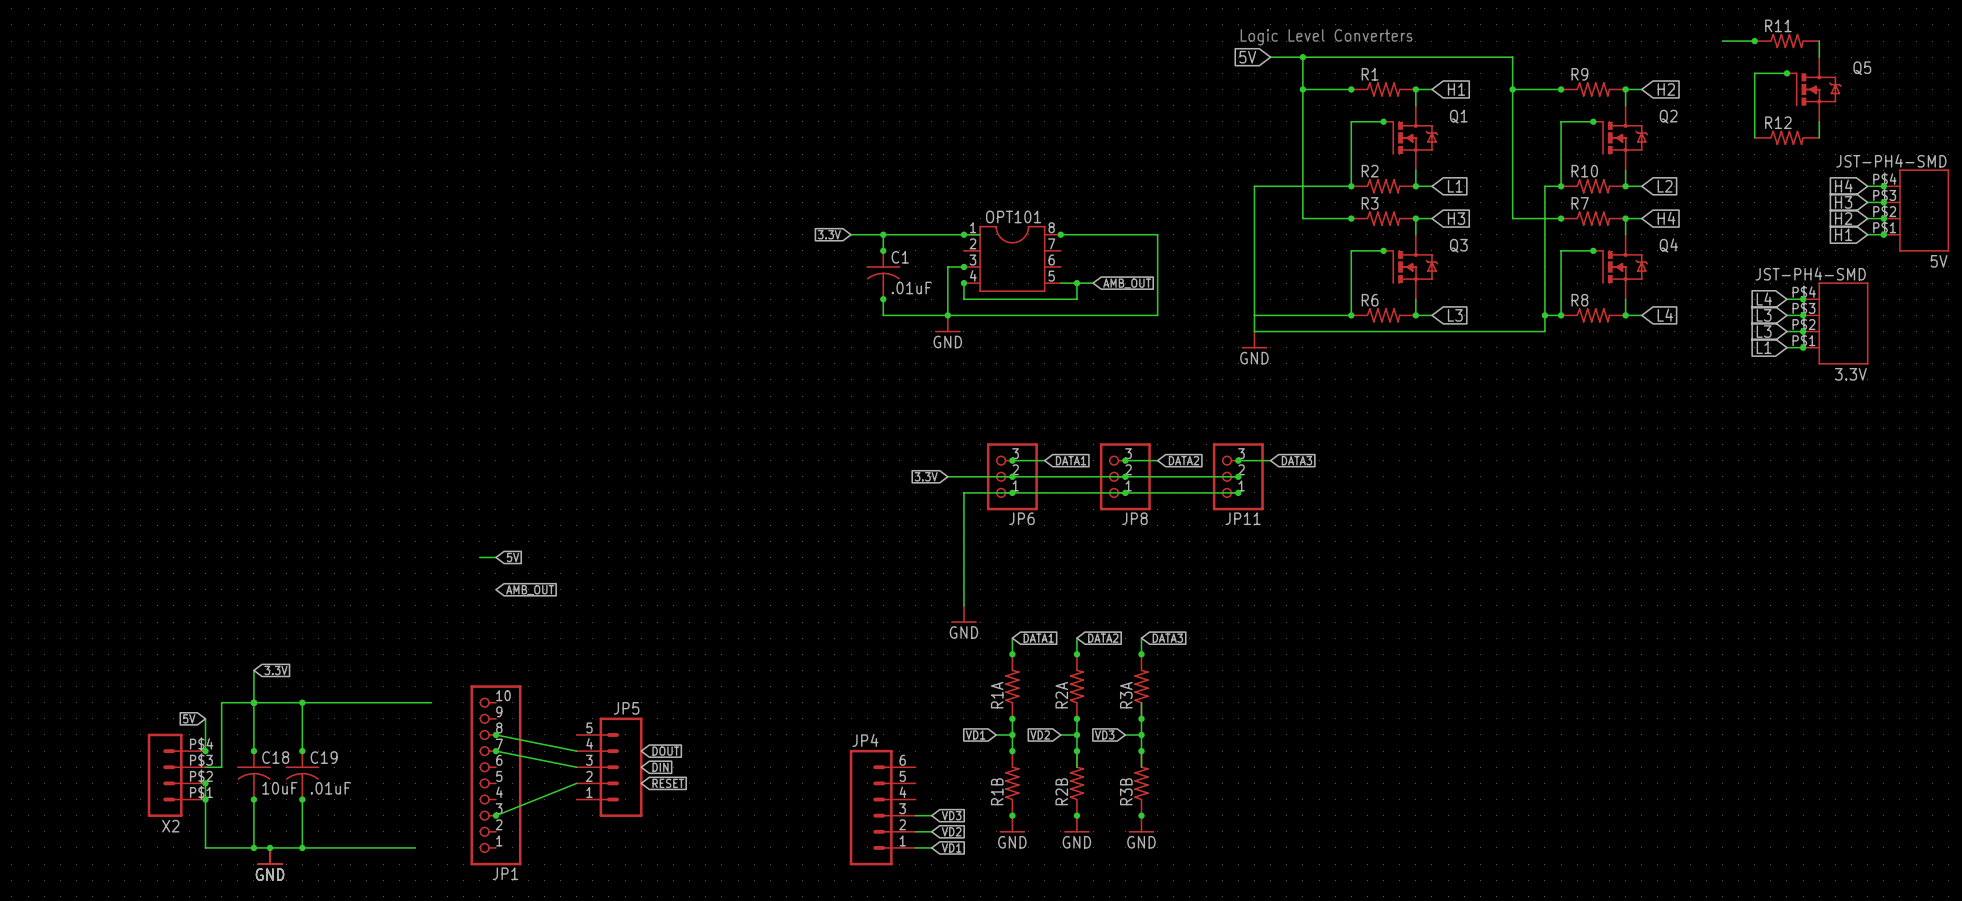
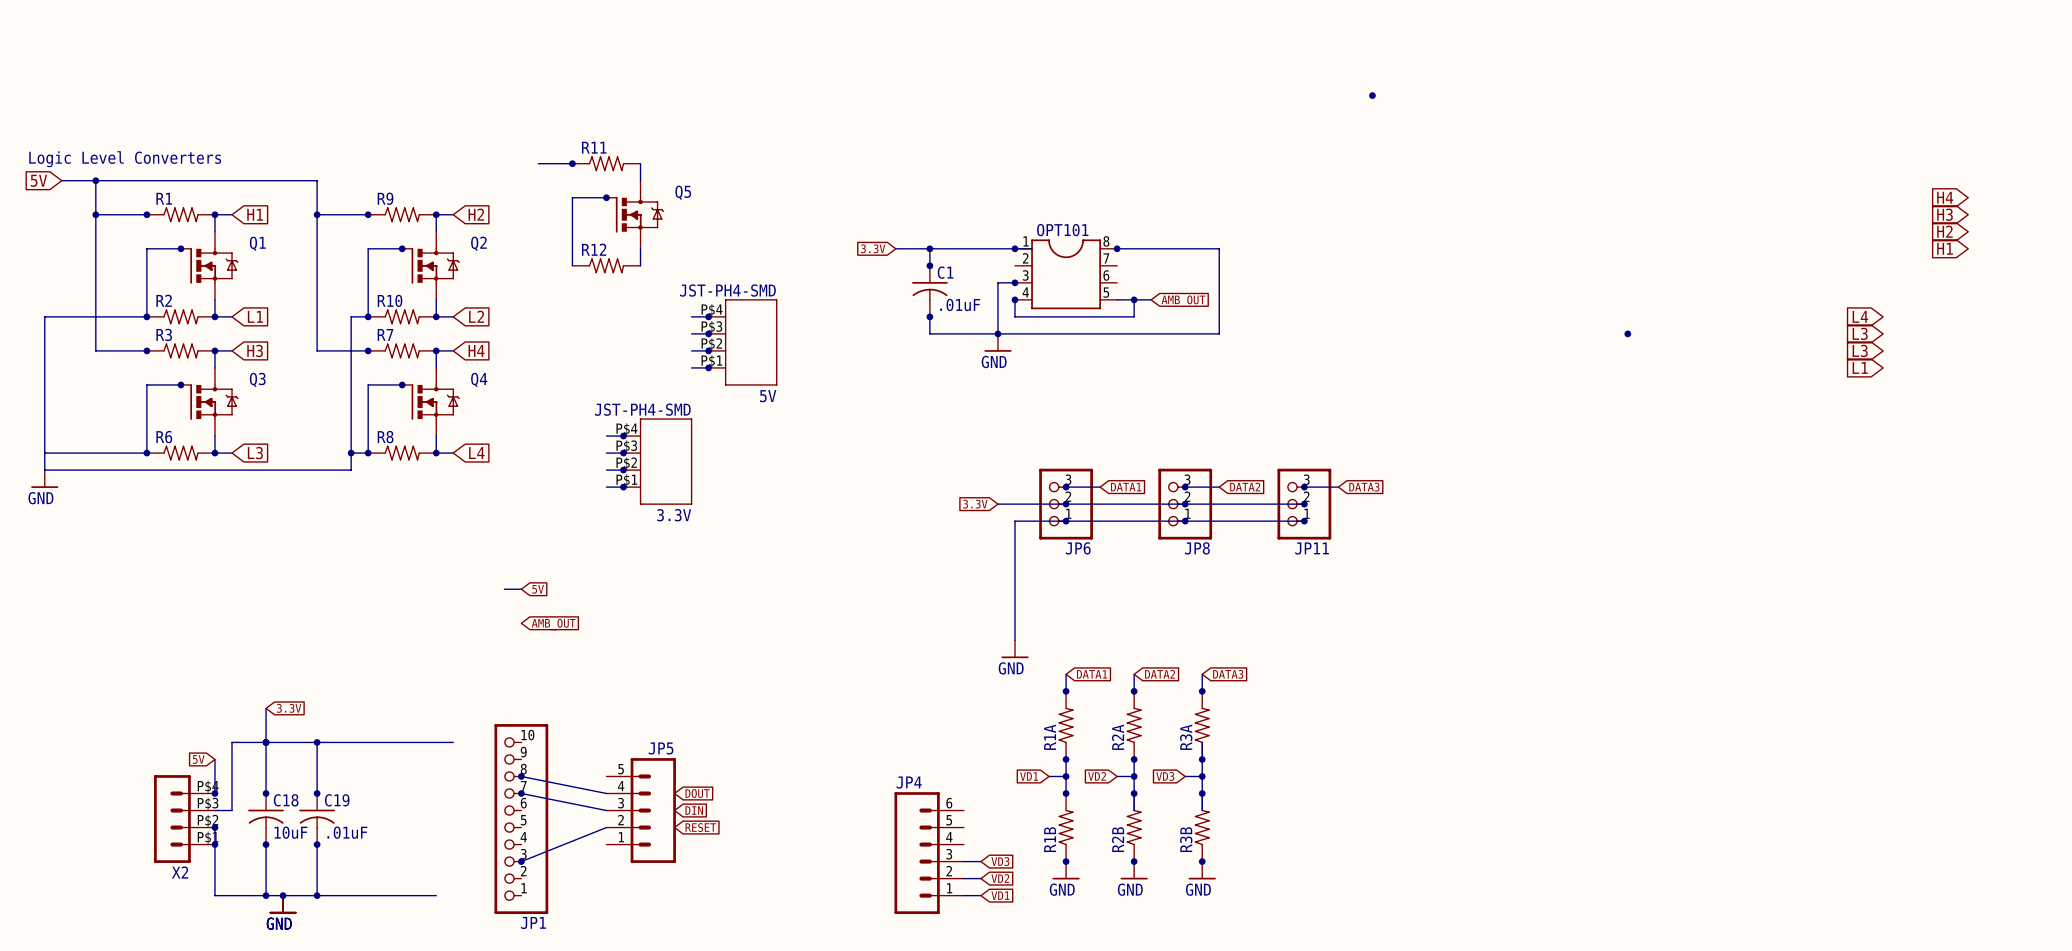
text: Logic Level Converters (1326, 37) -> none
wire: (1722, 41) (1754, 41) -> none
junction: (1754, 41) -> none
R11 position: (1786, 41) -> (606, 163)
wire: (1819, 41) (1819, 57) -> none
global label: 5V (1247, 57) -> none
wire: (1270, 57) (1512, 57) (1512, 218) (1561, 218) -> none
wire: (1302, 57) (1302, 218) (1351, 218) -> none
junction: (1302, 57) -> none
wire: (1786, 73) (1754, 73) (1754, 137) -> none
junction: (1786, 73) -> none
wire: (1302, 89) (1351, 89) -> none
junction: (1351, 89) -> none
R1 position: (1383, 89) -> (180, 214)
junction: (1415, 89) -> none
wire: (1431, 89) (1415, 89) (1415, 105) -> none
global label: H1 (1456, 89) -> none
wire: (1512, 89) (1561, 89) -> none
junction: (1512, 89) -> none
junction: (1561, 89) -> none
R9 position: (1593, 89) -> (402, 214)
junction: (1625, 89) -> none
wire: (1641, 89) (1625, 89) (1625, 105) -> none
global label: H2 (1666, 89) -> none
Q5 position: (1814, 89) -> (634, 214)
wire: (1383, 121) (1351, 121) (1351, 186) (1254, 186) (1254, 331) (1544, 331) (1544, 186) (1561, 186) (1561, 121) (1593, 121) -> none
junction: (1383, 121) -> none
junction: (1593, 121) -> none
wire: (1819, 121) (1819, 137) -> none
Q1 position: (1410, 137) -> (209, 265)
Q2 position: (1620, 137) -> (430, 265)
R12 position: (1786, 137) -> (606, 265)
text: none -> Logic Level Converters (125, 159)
wire: none -> (538, 163) (572, 163)
junction: none -> (572, 163)
wire: none -> (640, 163) (640, 180)
global label: none -> 5V (38, 180)
wire: none -> (61, 180) (317, 180) (317, 350) (368, 350)
wire: none -> (95, 180) (95, 350) (146, 350)
junction: none -> (95, 180)
wire: (1415, 170) (1415, 186) (1431, 186) -> none
wire: (1625, 170) (1625, 186) (1641, 186) -> none
wire: none -> (606, 197) (572, 197) (572, 265)
junction: none -> (606, 197)
junction: (1351, 186) -> none
R2 position: (1383, 186) -> (180, 316)
junction: (1415, 186) -> none
global label: L1 (1455, 186) -> none
junction: (1561, 186) -> none
R10 position: (1593, 186) -> (402, 316)
junction: (1625, 186) -> none
global label: L2 (1665, 186) -> none
wire: (1867, 186) (1883, 186) -> none
junction: (1883, 186) -> none
wire: none -> (95, 214) (146, 214)
junction: none -> (95, 214)
junction: none -> (146, 214)
junction: none -> (214, 214)
wire: none -> (232, 214) (214, 214) (214, 231)
global label: none -> H1 (255, 214)
wire: none -> (317, 214) (368, 214)
junction: none -> (317, 214)
junction: none -> (368, 214)
junction: none -> (436, 214)
wire: none -> (453, 214) (436, 214) (436, 231)
global label: none -> H2 (476, 214)
wire: (1867, 202) (1883, 202) -> none
junction: (1883, 202) -> none
5V position: (1916, 210) -> (742, 342)
junction: (1351, 218) -> none
R3 position: (1383, 218) -> (180, 350)
junction: (1415, 218) -> none
wire: (1431, 218) (1415, 218) (1415, 234) -> none
global label: H3 (1456, 218) -> none
junction: (1561, 218) -> none
R7 position: (1593, 218) -> (402, 350)
junction: (1625, 218) -> none
wire: (1641, 218) (1625, 218) (1625, 234) -> none
global label: H4 (1666, 218) -> none
wire: (1867, 218) (1883, 218) -> none
junction: (1883, 218) -> none
wire: none -> (180, 248) (146, 248) (146, 316) (44, 316) (44, 470) (351, 470) (351, 316) (368, 316) (368, 248) (402, 248)
junction: none -> (180, 248)
junction: none -> (402, 248)
wire: none -> (640, 248) (640, 265)
wire: (1867, 234) (1883, 234) -> none
junction: (1883, 234) -> none
wire: (1383, 250) (1351, 250) (1351, 315) (1254, 315) -> none
junction: (1383, 250) -> none
wire: (1593, 250) (1561, 250) (1561, 315) (1544, 315) -> none
junction: (1593, 250) -> none
Q3 position: (1410, 266) -> (209, 402)
Q4 position: (1620, 266) -> (430, 402)
wire: none -> (214, 299) (214, 316) (232, 316)
wire: none -> (436, 299) (436, 316) (453, 316)
junction: none -> (146, 316)
junction: none -> (214, 316)
global label: none -> L1 (255, 316)
junction: none -> (368, 316)
junction: none -> (436, 316)
global label: none -> L2 (476, 316)
wire: none -> (691, 316) (708, 316)
junction: none -> (708, 316)
wire: (1415, 299) (1415, 315) (1431, 315) -> none
wire: (1625, 299) (1625, 315) (1641, 315) -> none
wire: (1786, 299) (1803, 299) -> none
junction: (1803, 299) -> none
wire: none -> (691, 333) (708, 333)
junction: none -> (708, 333)
junction: (1351, 315) -> none
R6 position: (1383, 315) -> (180, 453)
junction: (1415, 315) -> none
global label: L3 (1455, 315) -> none
junction: (1561, 315) -> none
R8 position: (1593, 315) -> (402, 453)
junction: (1625, 315) -> none
global label: L4 (1665, 315) -> none
wire: (1786, 315) (1803, 315) -> none
junction: (1803, 315) -> none
3.3V position: (1835, 323) -> (657, 461)
junction: none -> (146, 350)
junction: none -> (214, 350)
wire: none -> (232, 350) (214, 350) (214, 367)
global label: none -> H3 (255, 350)
junction: none -> (368, 350)
junction: none -> (436, 350)
wire: none -> (453, 350) (436, 350) (436, 367)
global label: none -> H4 (476, 350)
wire: none -> (691, 350) (708, 350)
junction: none -> (708, 350)
wire: (1786, 331) (1803, 331) -> none
junction: (1803, 331) -> none
power symbol: GND (1254, 340) -> none
wire: none -> (691, 367) (708, 367)
junction: none -> (708, 367)
wire: (1786, 347) (1803, 347) -> none
junction: (1803, 347) -> none
wire: none -> (180, 384) (146, 384) (146, 453) (44, 453)
junction: none -> (180, 384)
wire: none -> (402, 384) (368, 384) (368, 453) (351, 453)
junction: none -> (402, 384)
wire: none -> (214, 436) (214, 453) (232, 453)
wire: none -> (436, 436) (436, 453) (453, 453)
wire: none -> (606, 436) (623, 436)
junction: none -> (623, 436)
junction: none -> (146, 453)
junction: none -> (214, 453)
global label: none -> L3 (255, 453)
junction: none -> (351, 453)
junction: none -> (368, 453)
junction: none -> (436, 453)
global label: none -> L4 (476, 453)
wire: none -> (606, 453) (623, 453)
junction: none -> (623, 453)
wire: none -> (606, 470) (623, 470)
junction: none -> (623, 470)
power symbol: none -> GND (44, 479)
wire: none -> (606, 487) (623, 487)
junction: none -> (623, 487)

